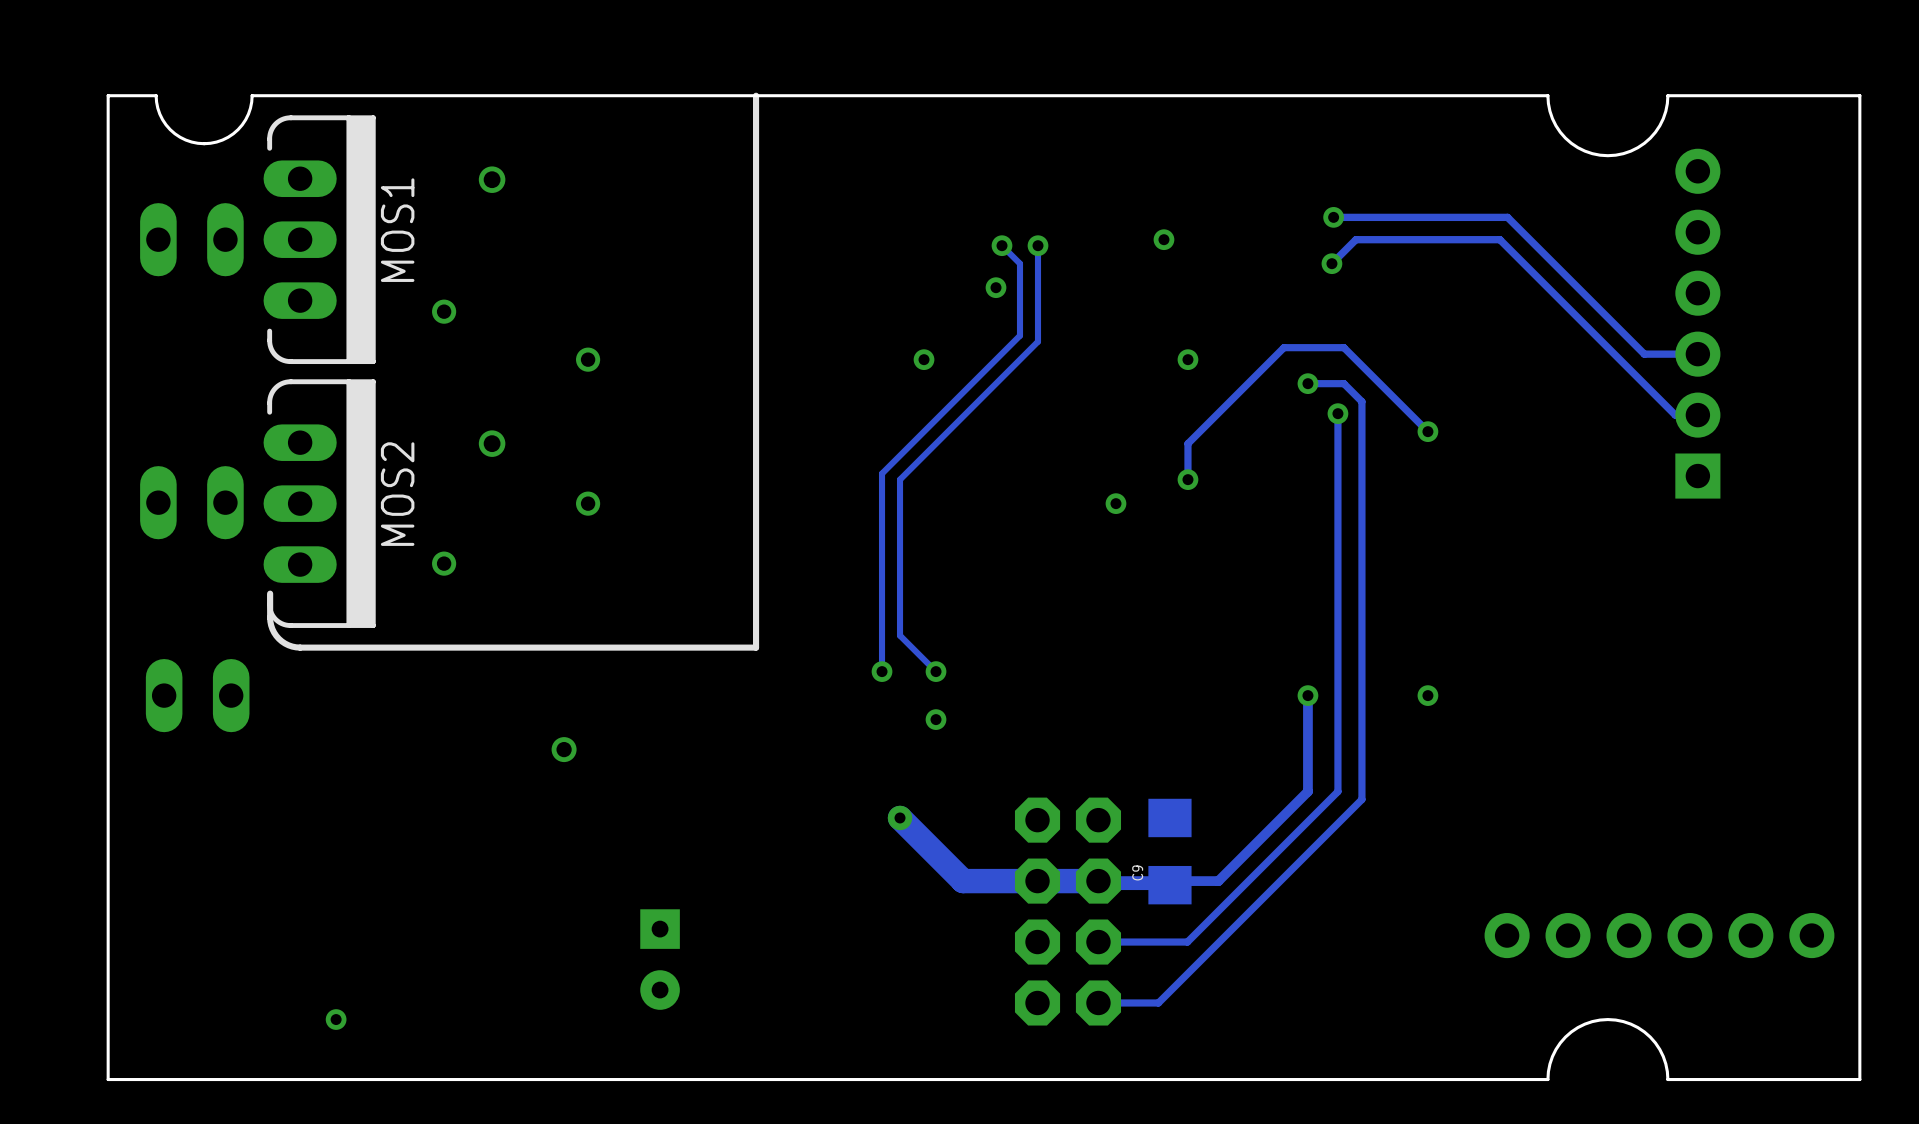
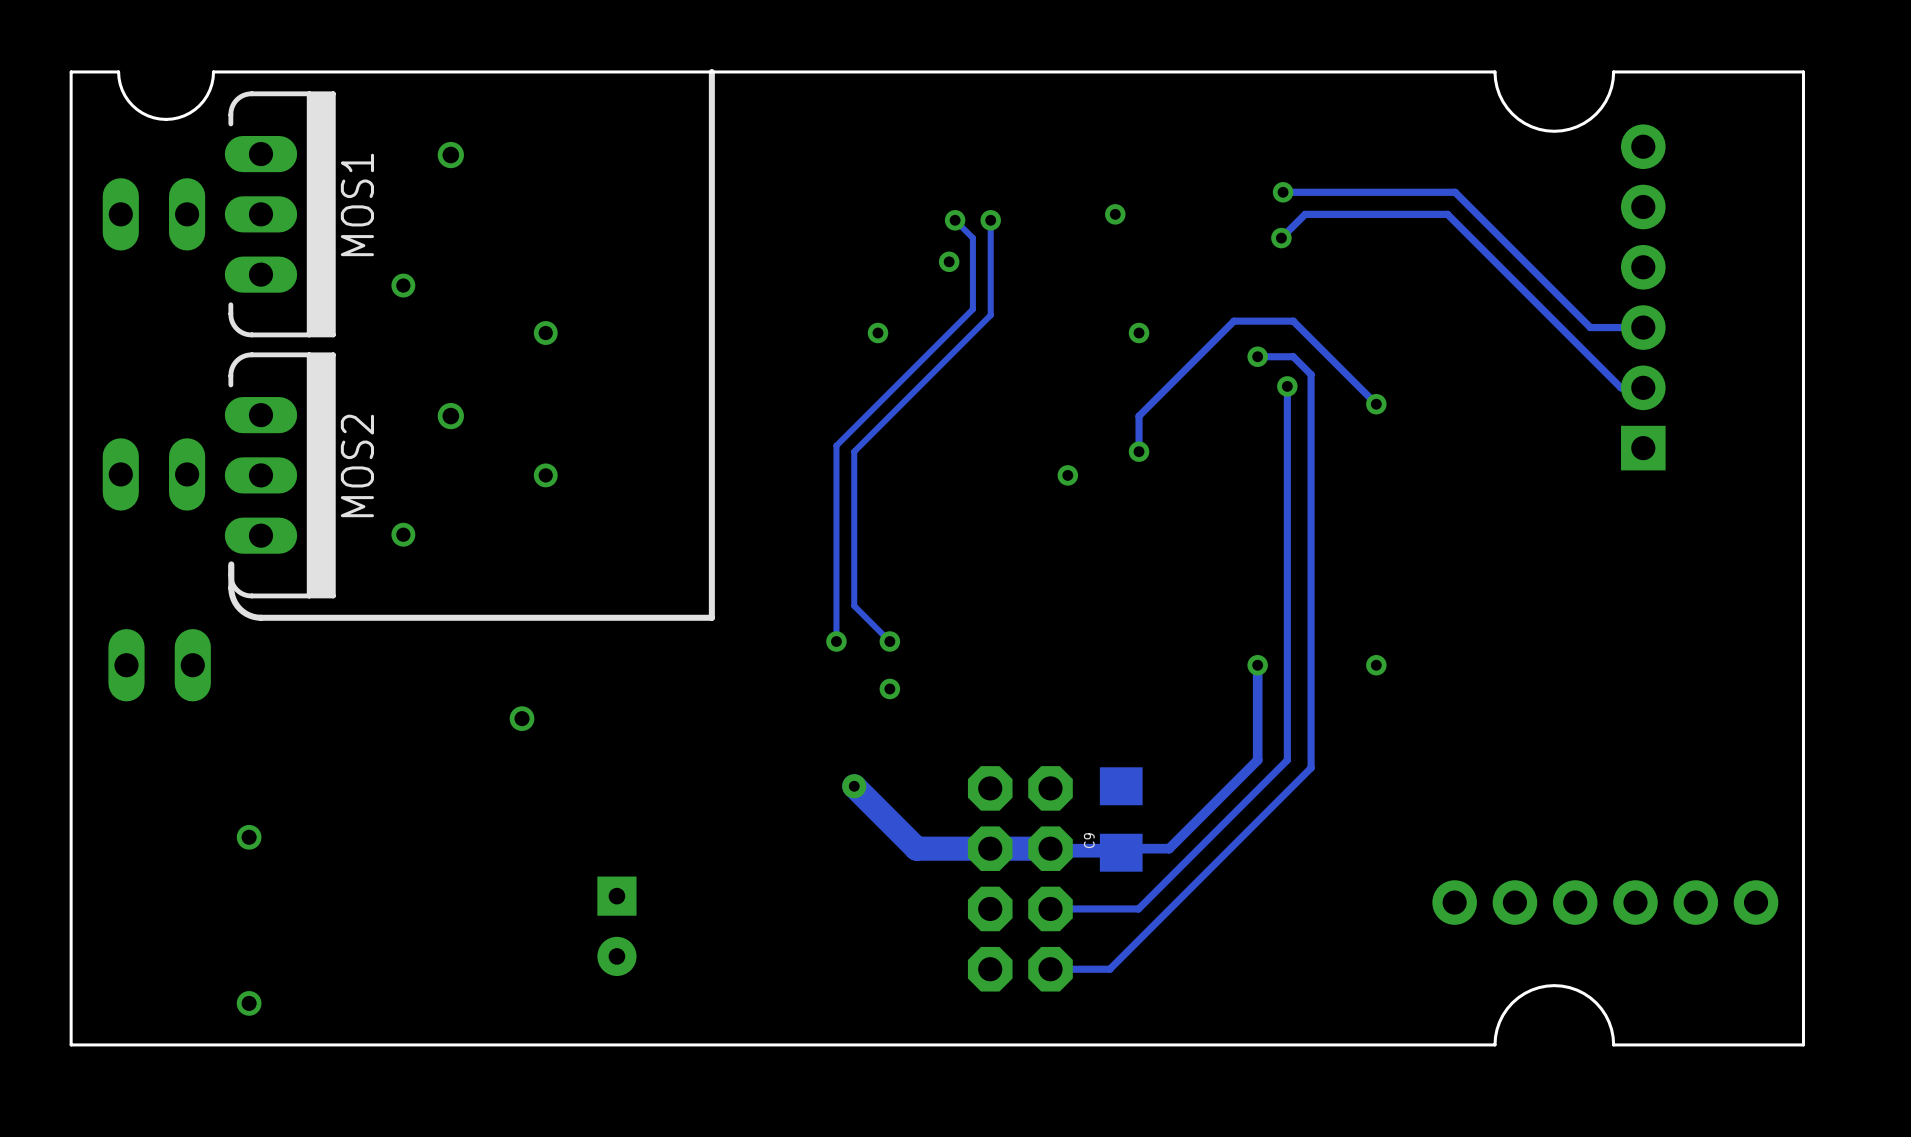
via: none -> (249, 837)
via: (336, 1019) -> none
via: none -> (249, 1003)

